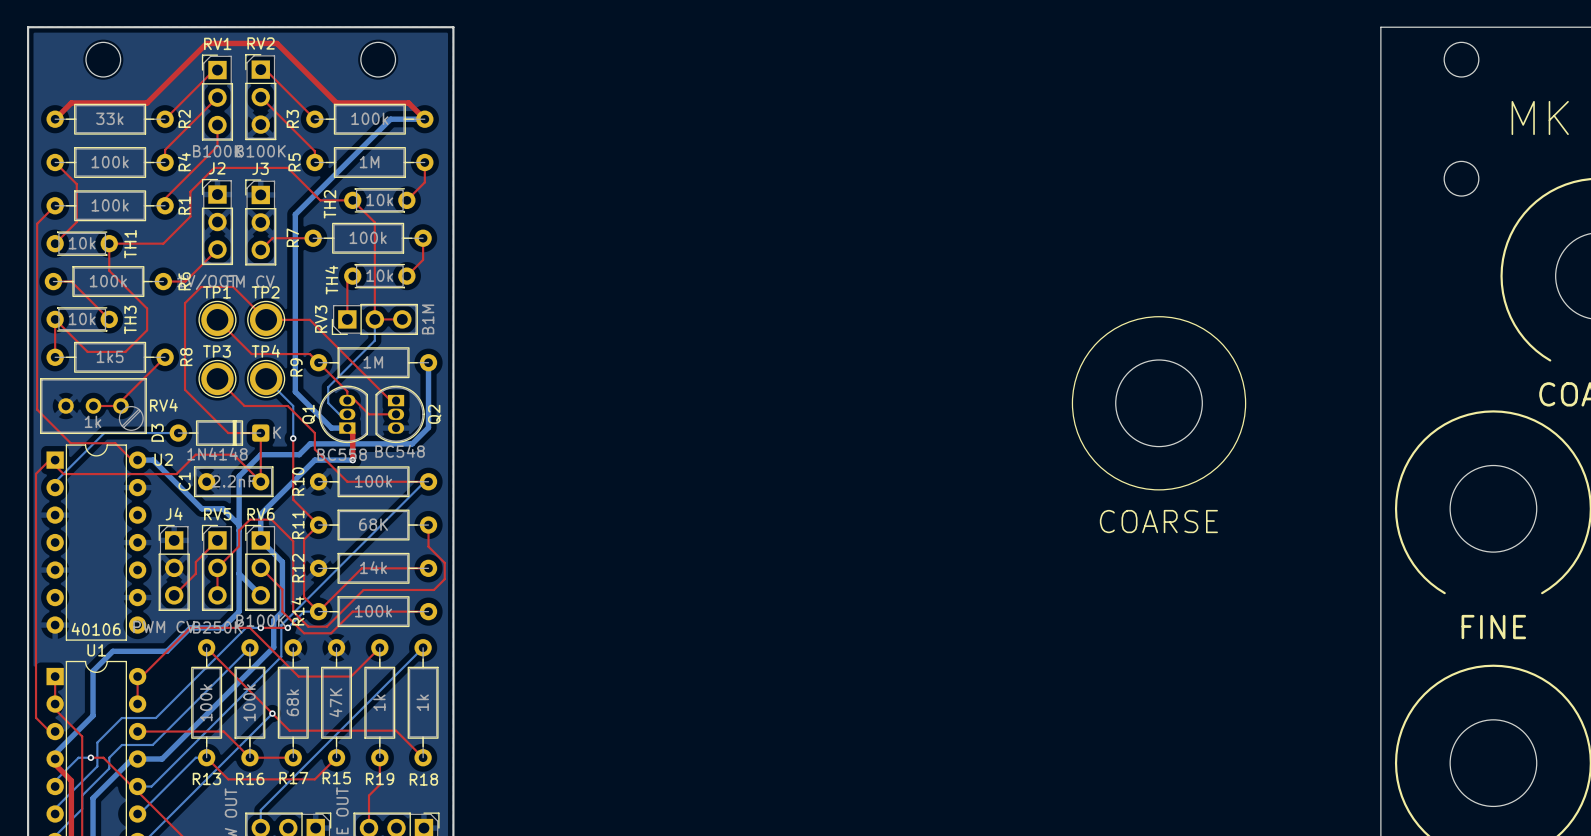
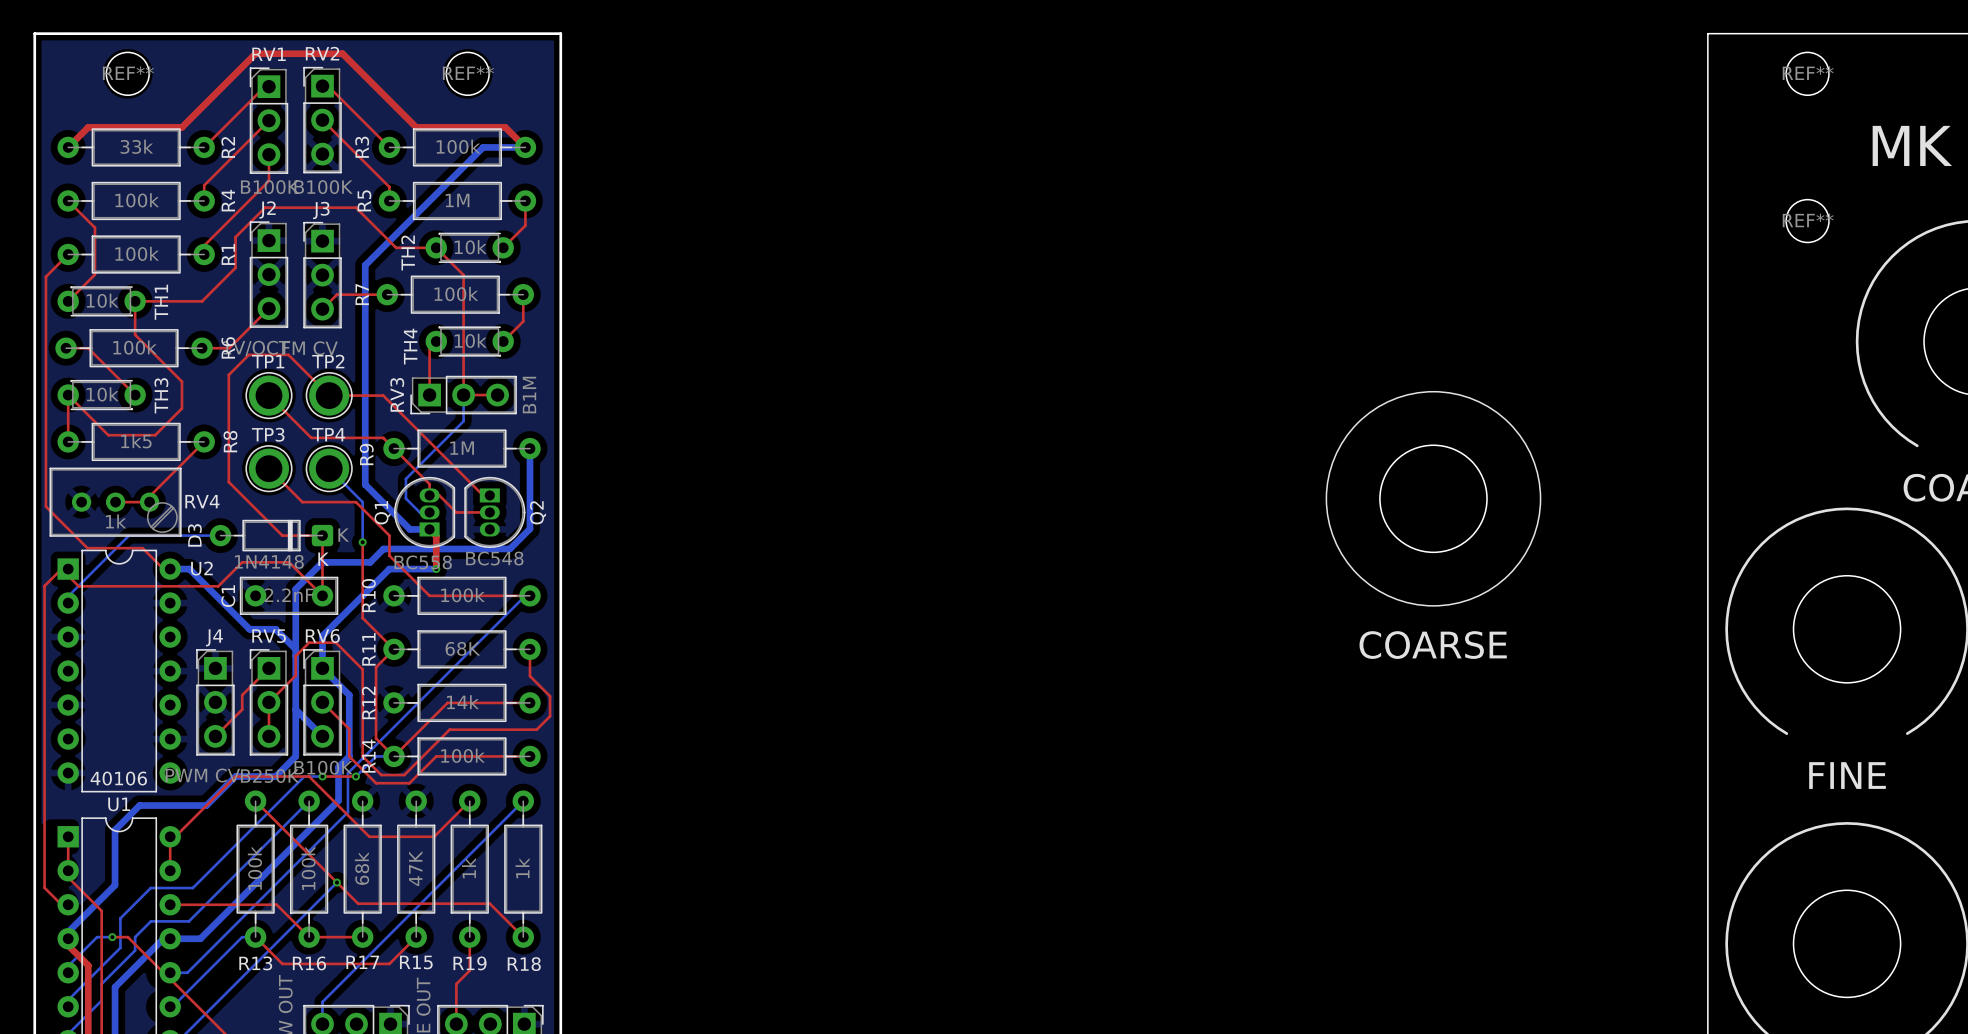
REF** name: none -> REF** (128, 73)
REF** name: none -> REF** (468, 73)
REF** name: none -> REF** (1808, 73)
REF** name: none -> REF** (1808, 220)
D3 text: none -> K (323, 559)

